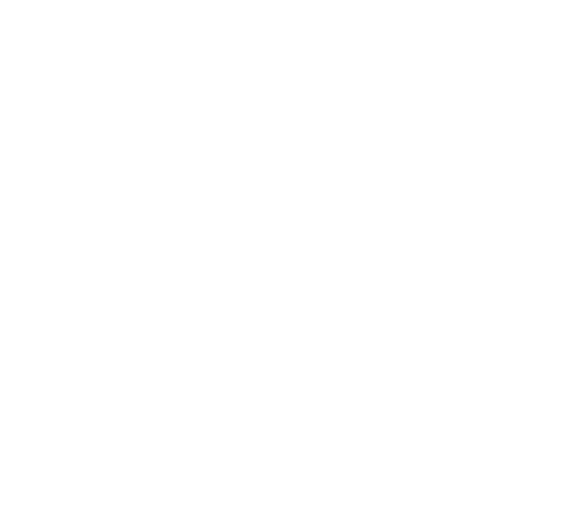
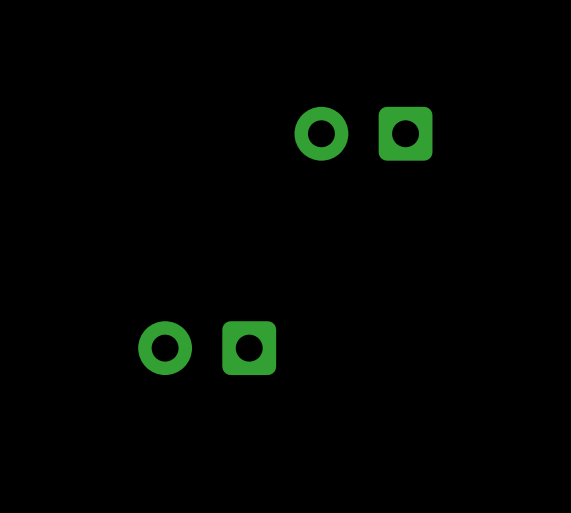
part: none -> (363, 133)
part: none -> (207, 348)

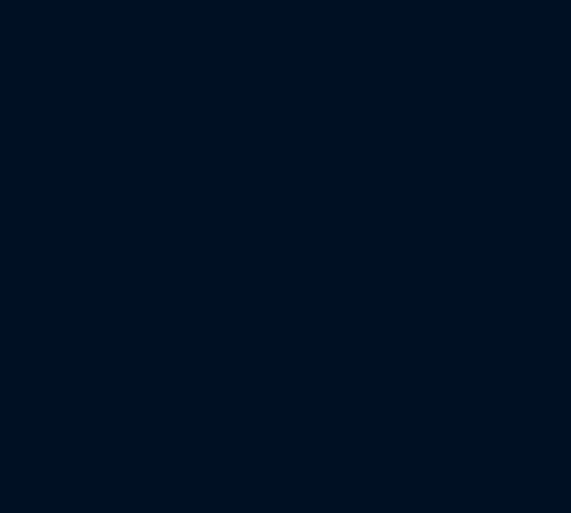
part: (363, 133) -> none
part: (207, 348) -> none

